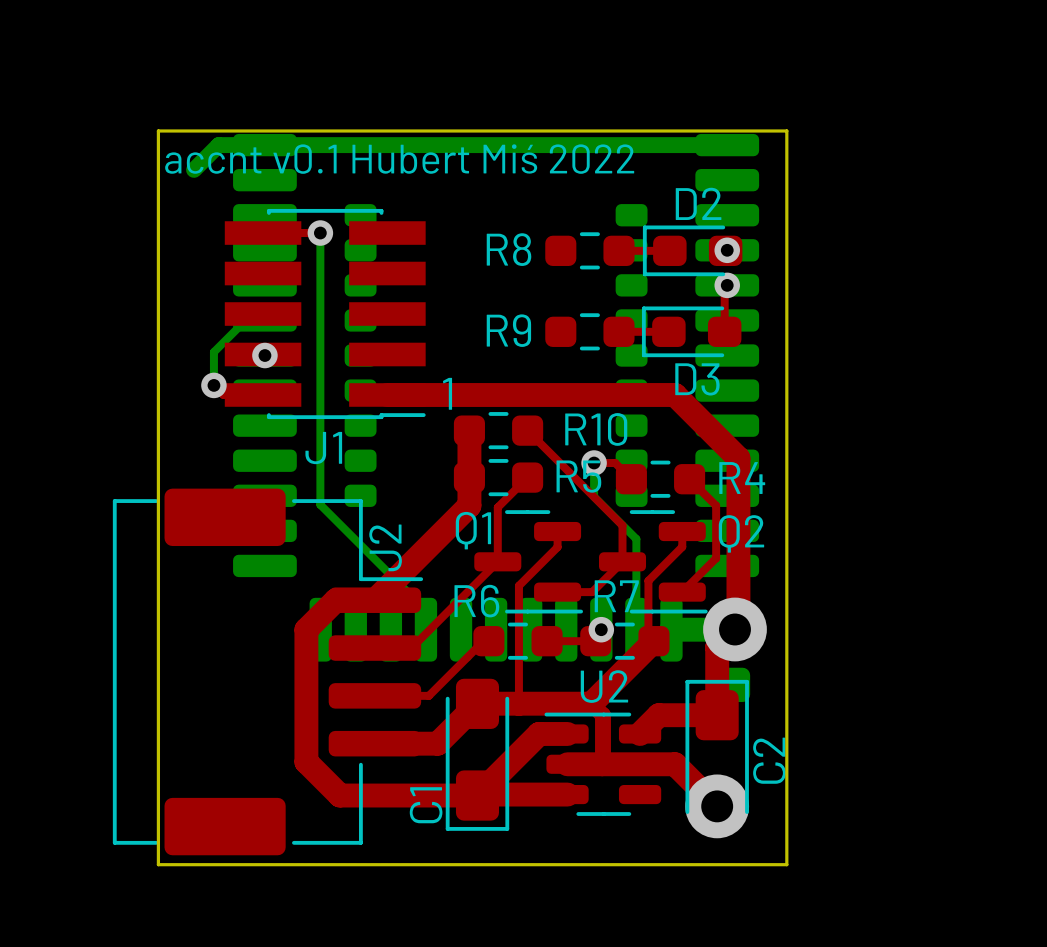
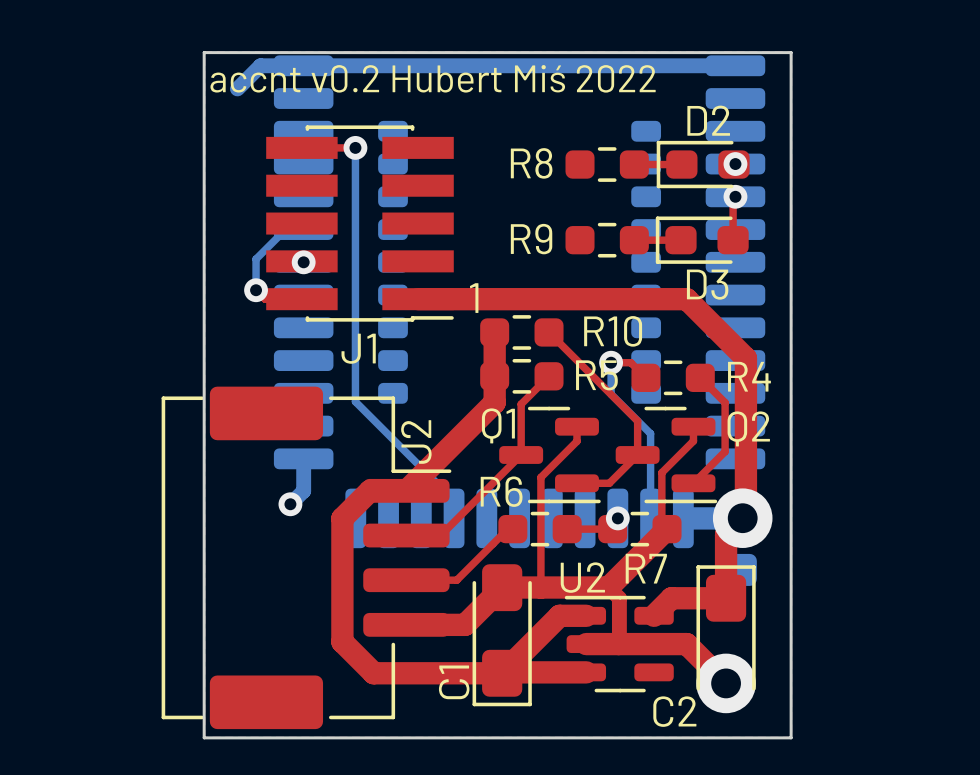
text: accnt v0.1 Hubert Miś 2022 (399, 159) -> accnt v0.2 Hubert Miś 2022 (433, 78)
bottom track: none -> (303, 458) (303, 491) (290, 504)
R7 name position: R7 (616, 596) -> R7 (646, 568)
via: none -> (290, 504)
U2 name position: U2 (604, 686) -> U2 (582, 577)
C2 name rotation: 0° (769, 760) -> 90° clockwise (674, 711)
C2 name position: C2 (769, 760) -> C2 (674, 711)

